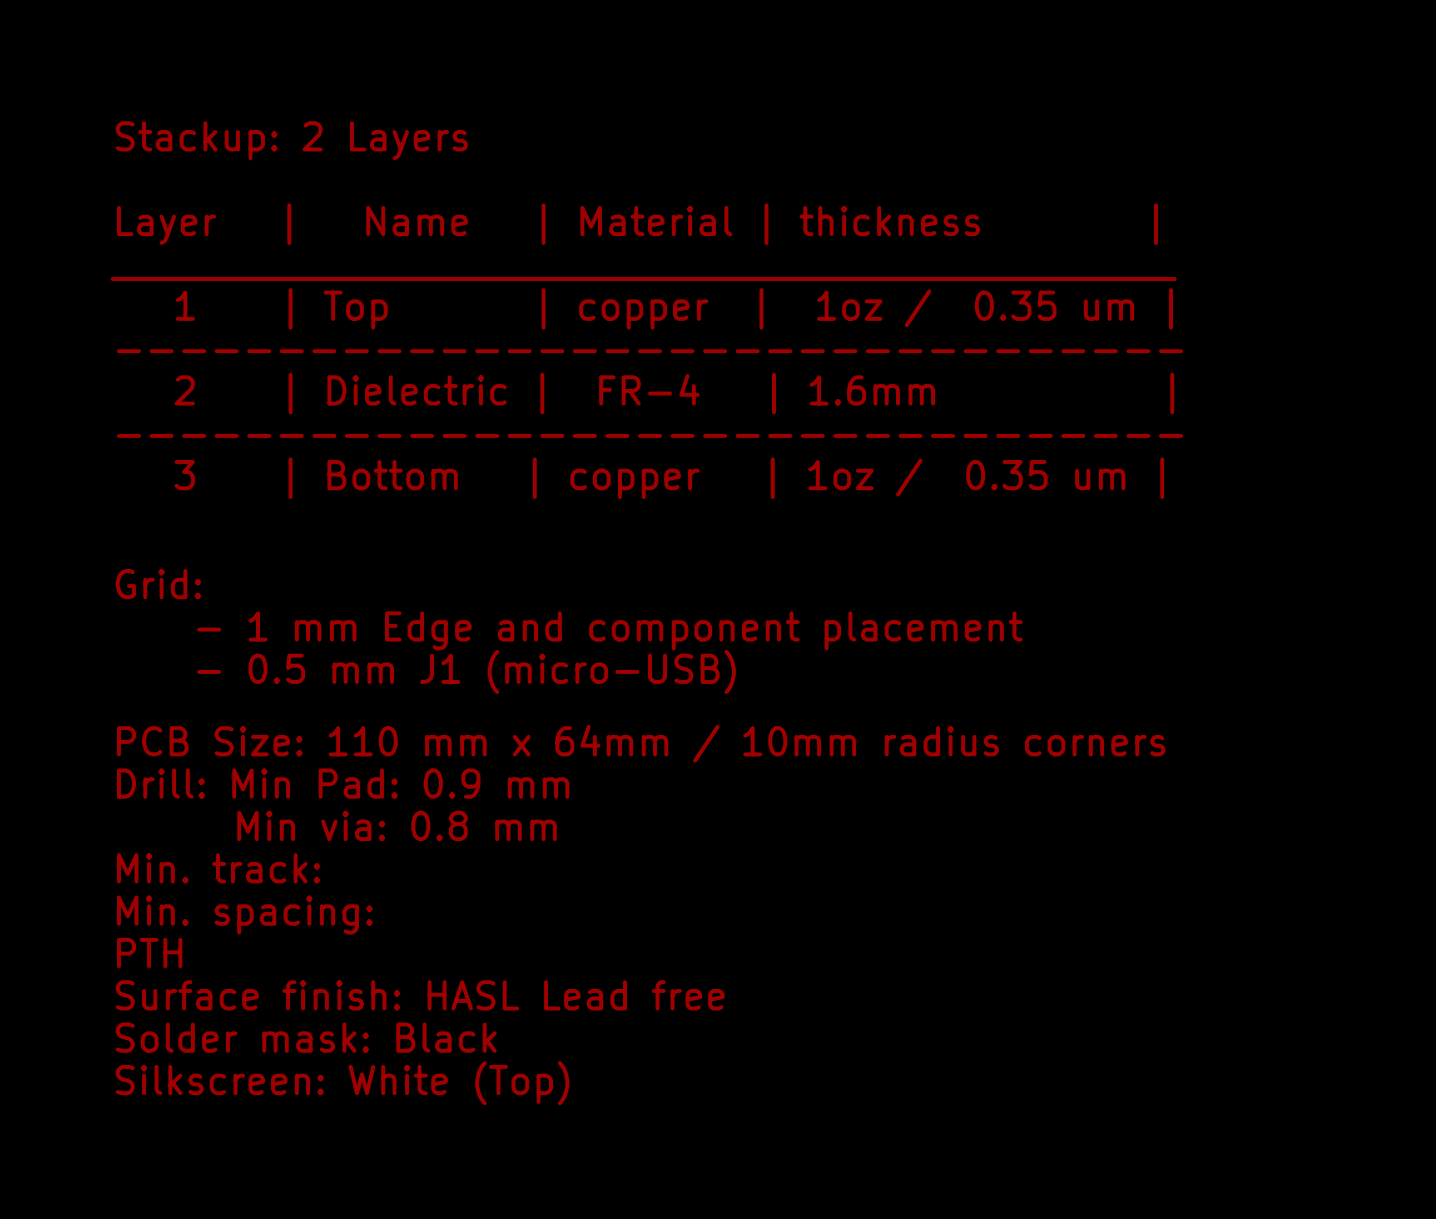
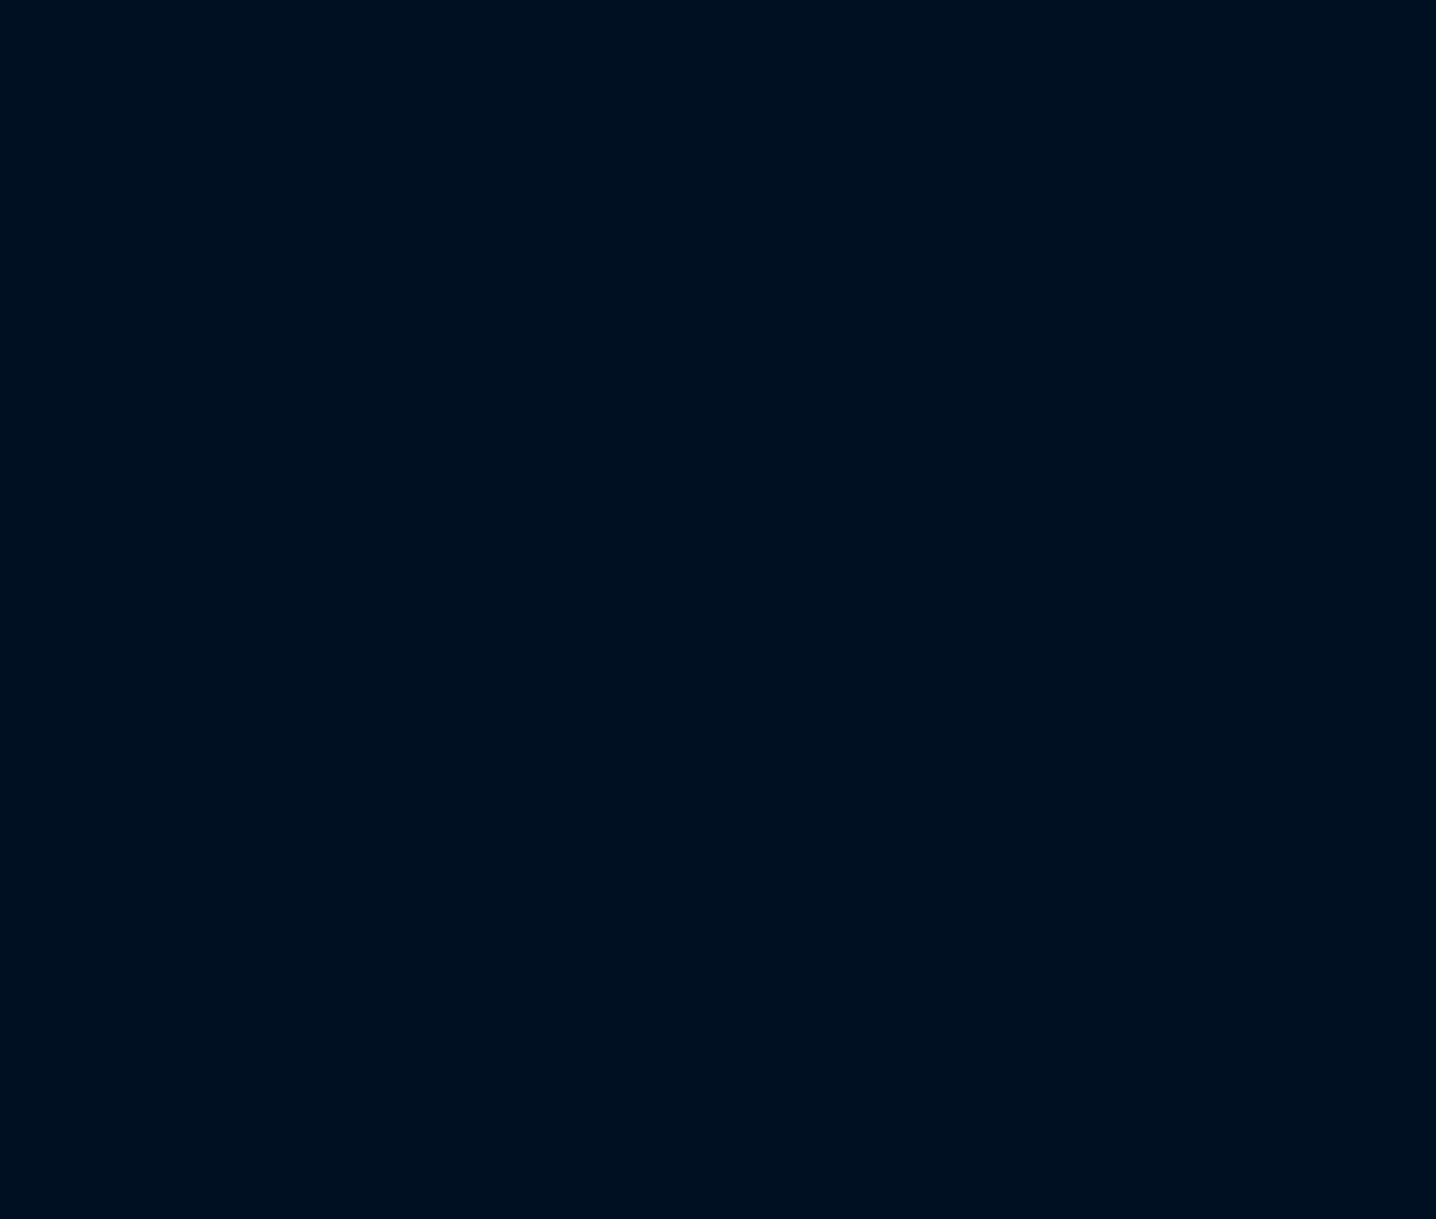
text: Stackup: 2 Layers (291, 140) -> none
text: Layer | Name | Material | thickness | (637, 224) -> none
text: _____________________________________________________ (643, 279) -> none
text: 1 | Top | copper | 1oz / 0.35 um | (674, 308) -> none
text: --------------------------------- (650, 351) -> none
text: 2 | Dielectric | FR-4 | 1.6mm | (674, 393) -> none
text: --------------------------------- (650, 435) -> none
text: 3 | Bottom | copper | 1oz / 0.35 um | (669, 478) -> none
text: Grid: (158, 584) -> none
text: - 1 mm Edge and component placement (609, 630) -> none
text: - 0.5 mm J1 (micro-USB) (466, 671) -> none
text: PCB Size: 110 mm x 64mm / 10mm radius corners (641, 743) -> none
text: Drill: Min Pad: 0.9 mm (343, 783) -> none
text: Min via: 0.8 mm (397, 825) -> none
text: Min. track: (218, 868) -> none
text: Min. spacing: (244, 915) -> none
text: PTH (149, 952) -> none
text: Surface finish: HASL Lead free (420, 995) -> none
text: Solder mask: Black (306, 1037) -> none
text: Silkscreen: White (Top) (342, 1083) -> none

